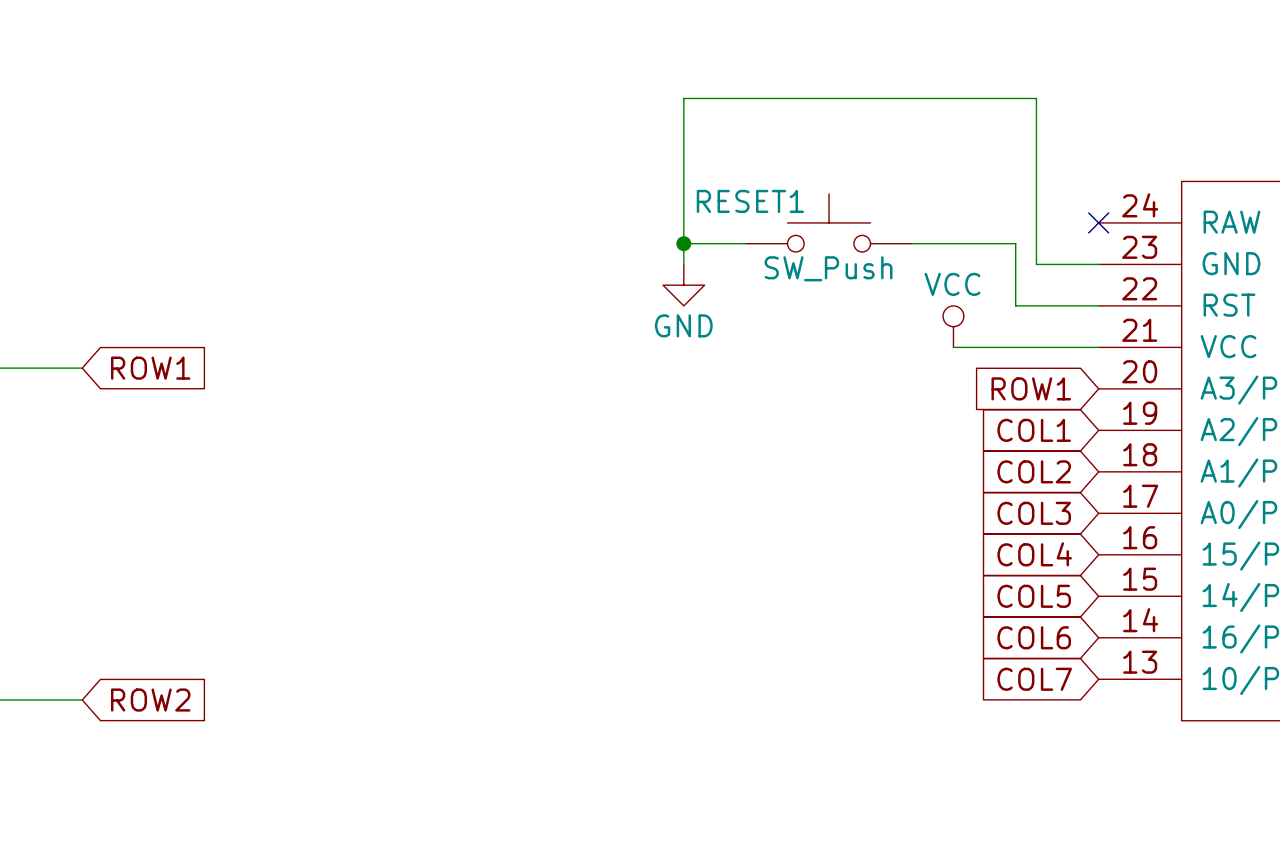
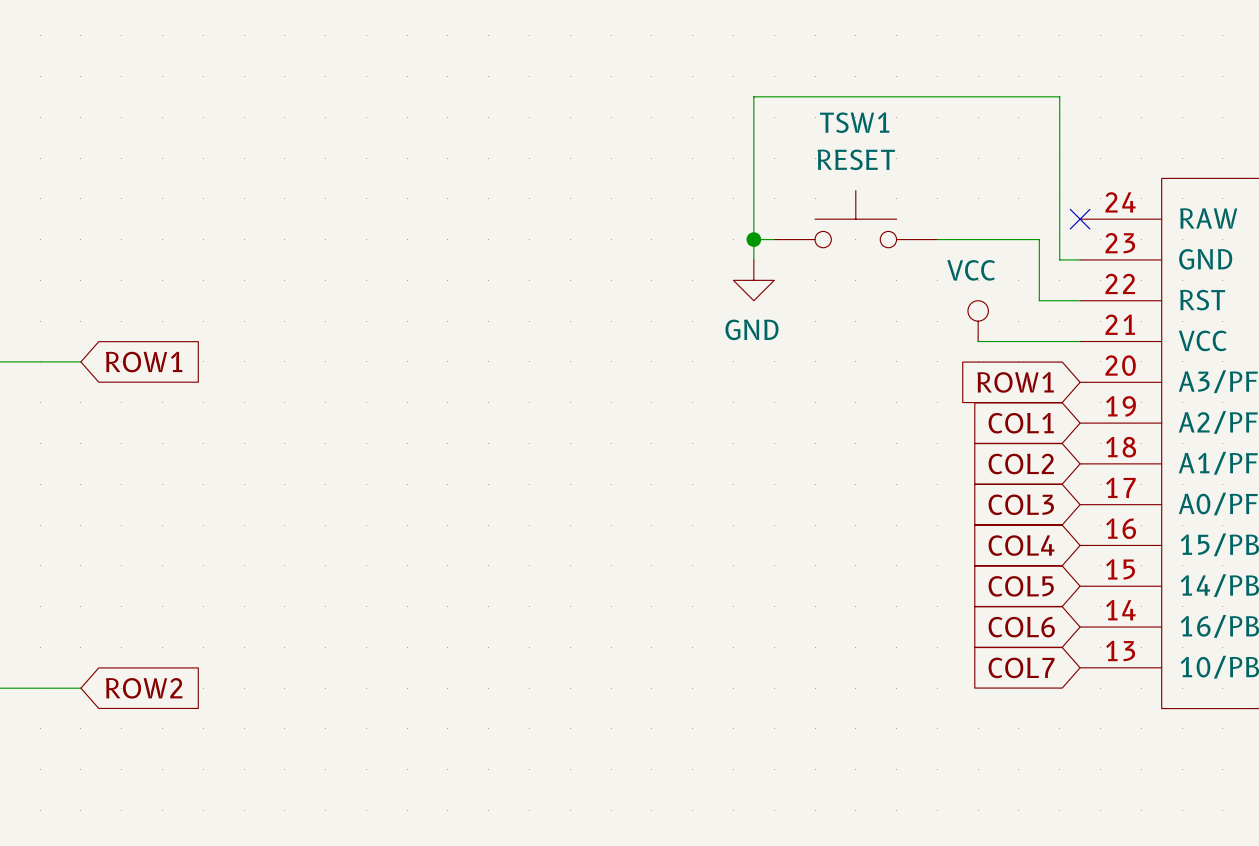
wire: (766, 98) (683, 98) (683, 264) -> (753, 96) (753, 259)
wire: (1036, 98) (1036, 264) (1077, 264) -> (1018, 96) (1059, 96) (1059, 259)
RESET1: SW_Push (829, 222) -> none
TSW1: none -> RESET (855, 219)
wire: (683, 243) (746, 243) -> none
junction position: (683, 243) -> (753, 239)
wire: (1015, 243) (1015, 305) (1057, 305) -> (998, 239) (1039, 239) (1039, 300)
power symbol text position: VCC (952, 284) -> VCC (971, 270)
power symbol position: GND (683, 285) -> GND (753, 280)
power symbol text position: GND (683, 325) -> GND (751, 329)
power symbol position: VCC (953, 326) -> VCC (978, 321)
wire: (953, 347) (994, 347) -> none

